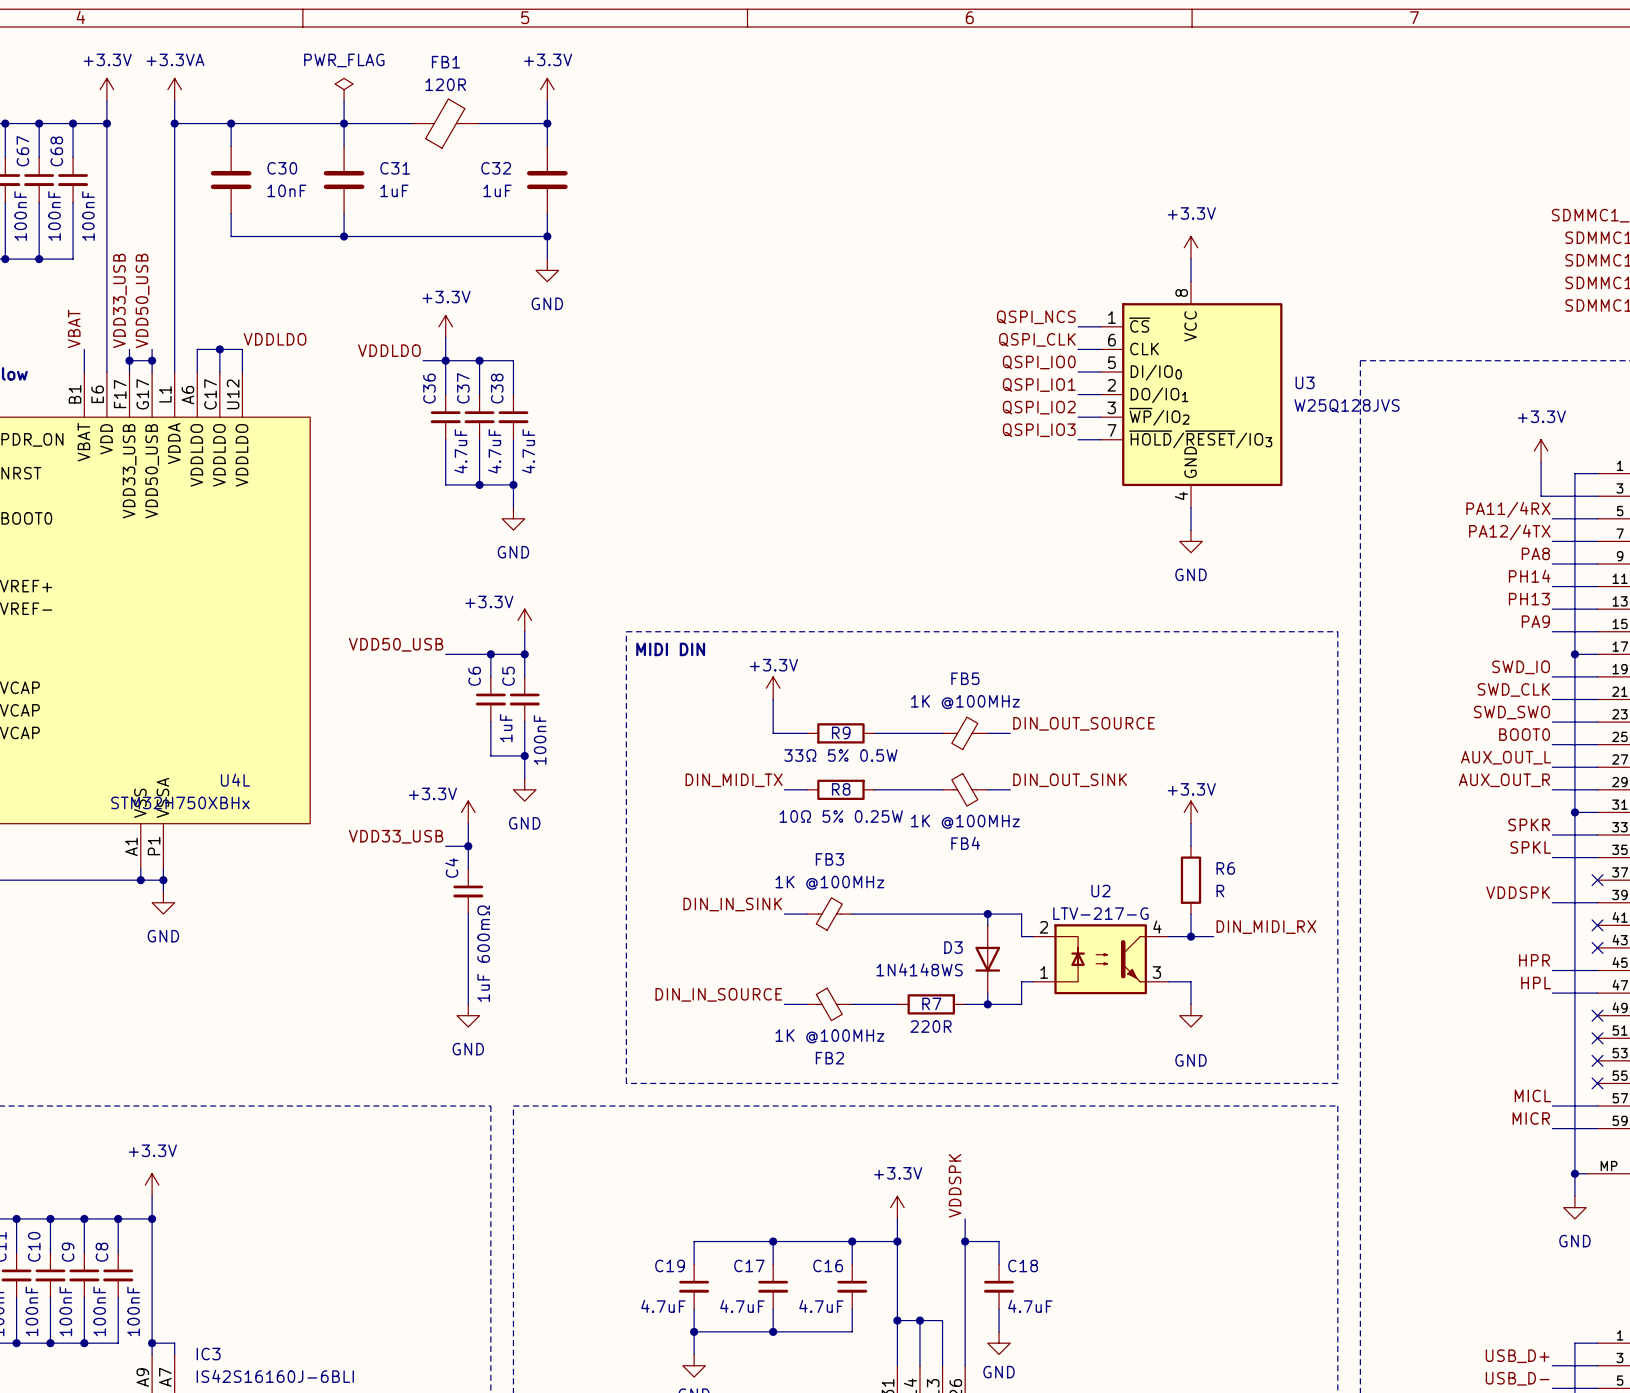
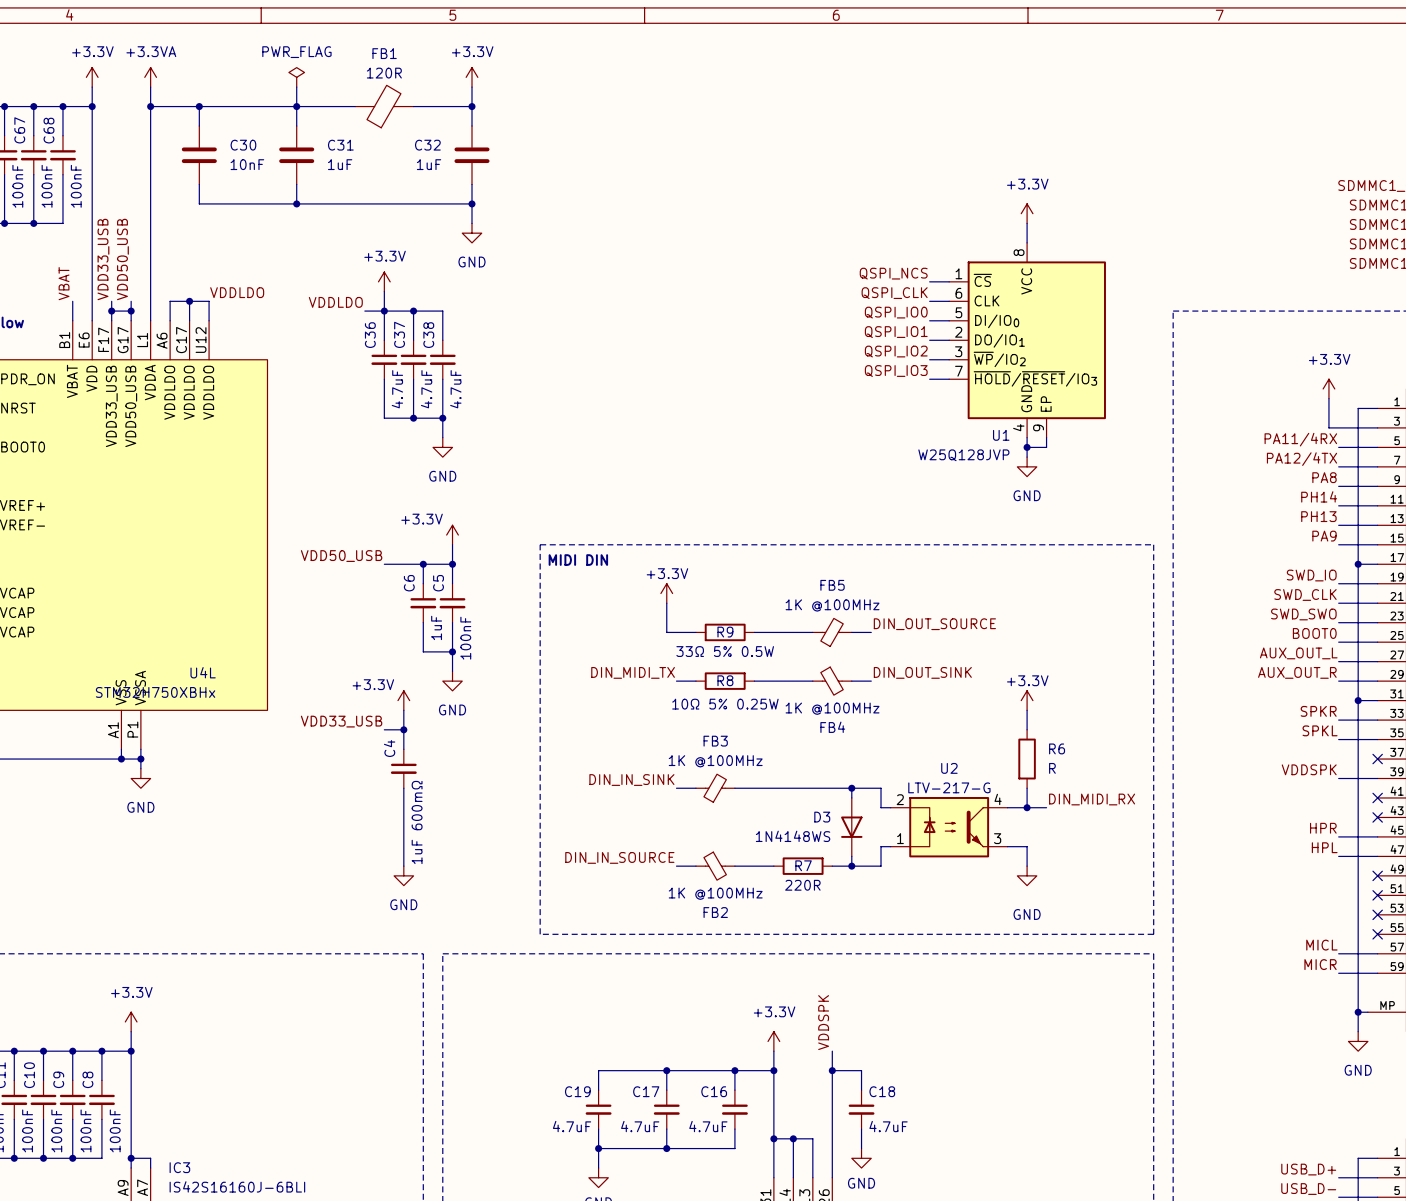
U3: W25Q128JVS (1191, 394) -> none
U1: none -> W25Q128JVP (1027, 340)
wire: none -> (1046, 437) (1046, 447) (1027, 447)
junction: none -> (1027, 447)

